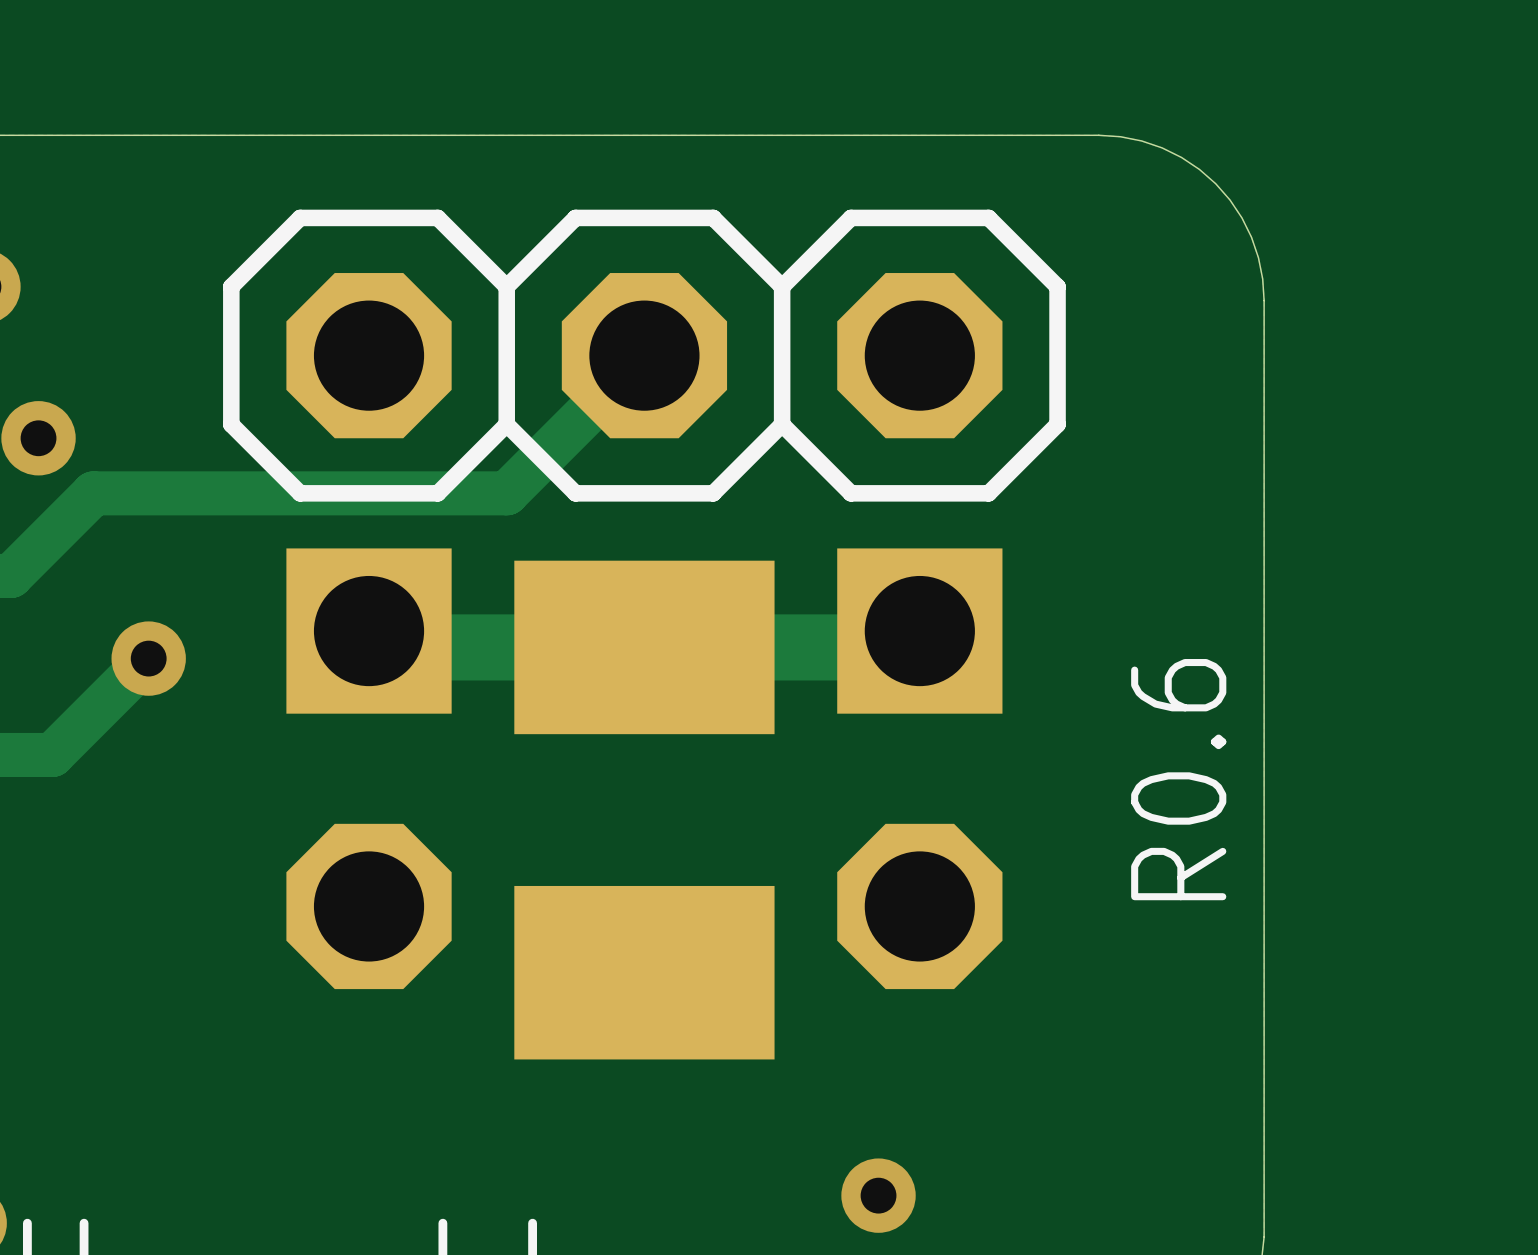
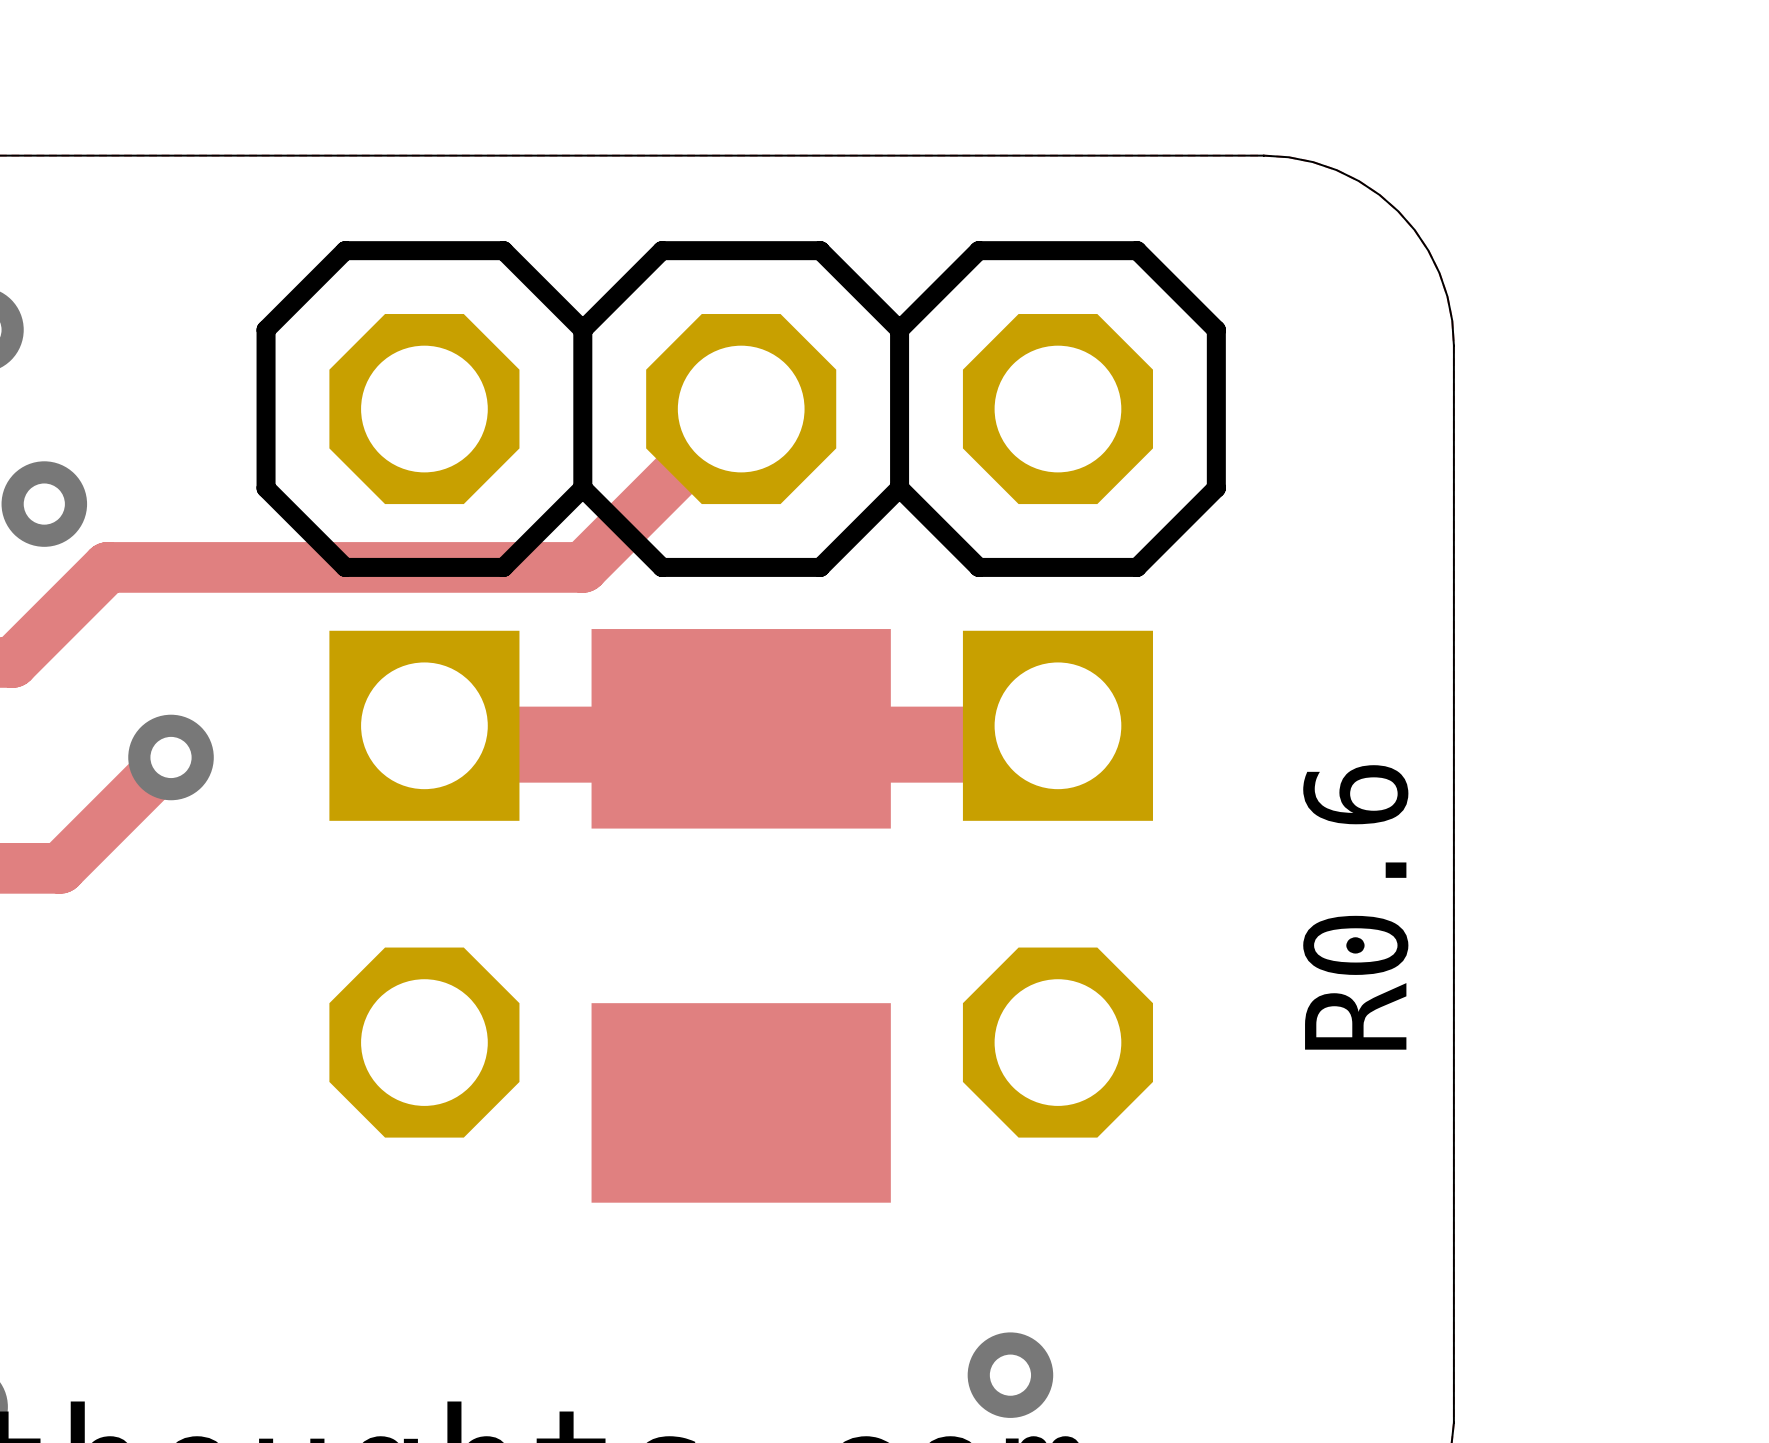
part position: (644, 810) -> (741, 915)

